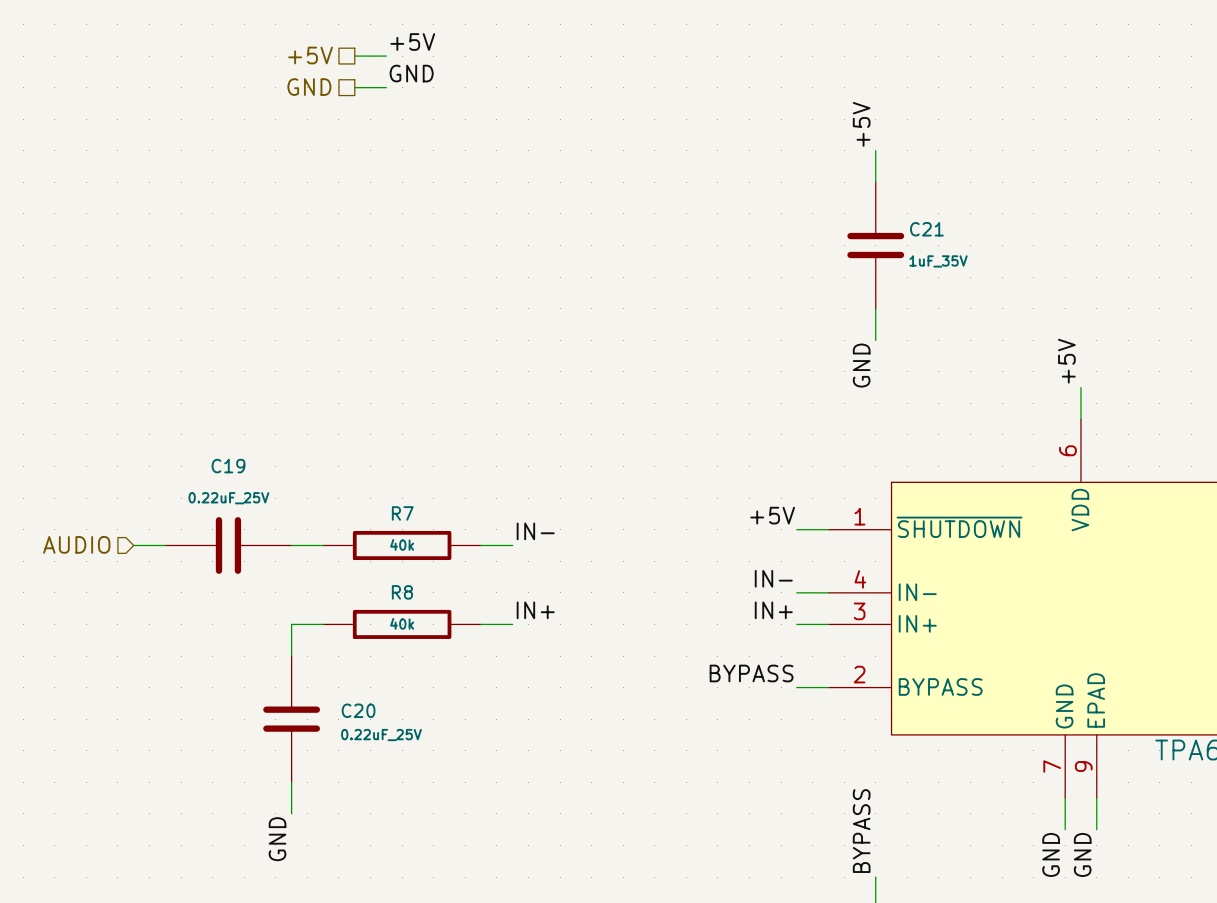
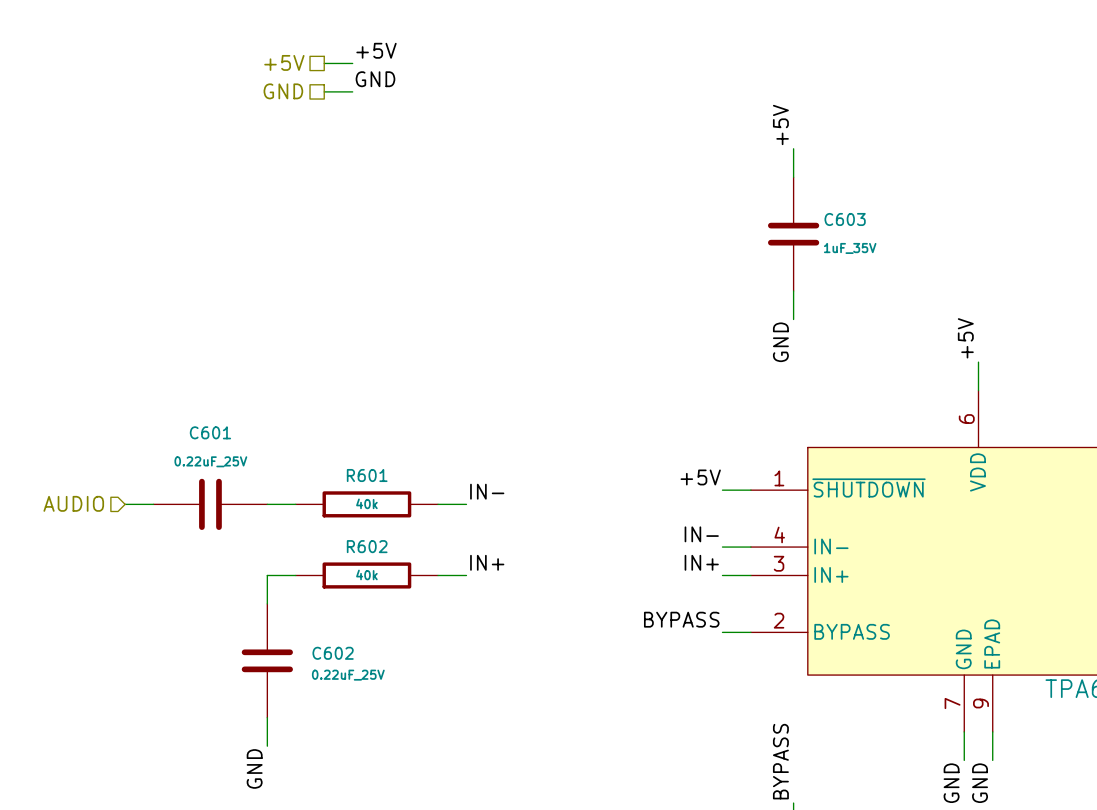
C21 name: C21 (926, 229) -> C603 (845, 219)
C19 name: C19 (228, 466) -> C601 (210, 432)
R7 name: R7 (402, 513) -> R601 (367, 475)
R8 name: R8 (402, 592) -> R602 (367, 546)
C20 name: C20 (358, 710) -> C602 (333, 653)

